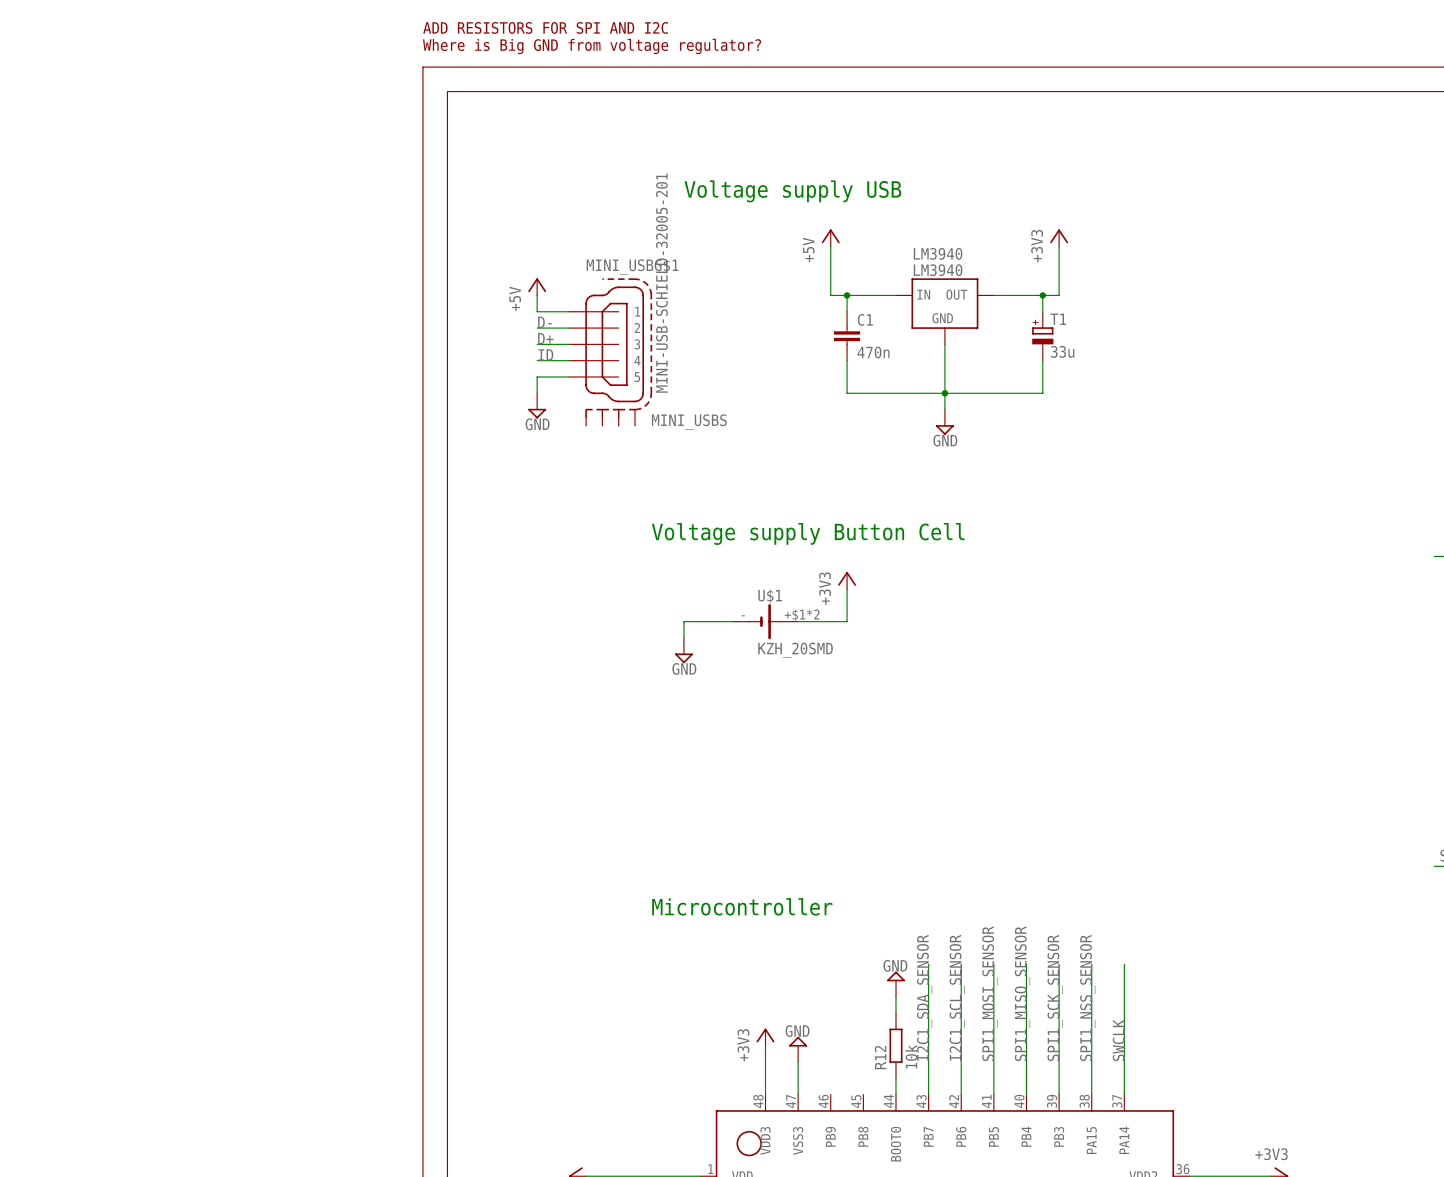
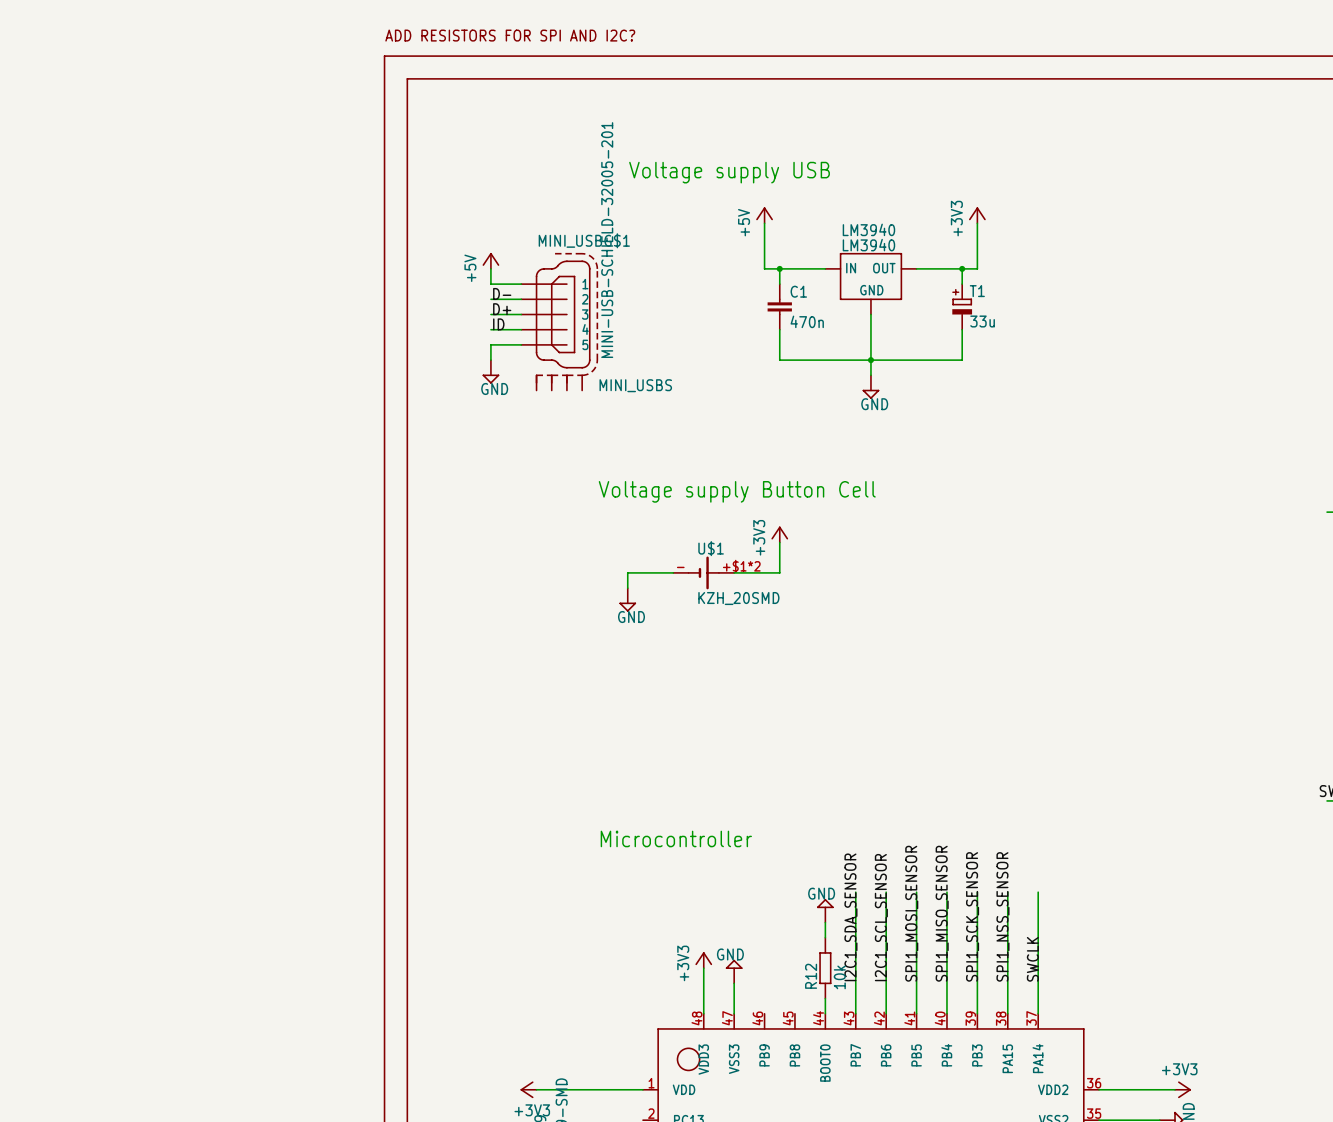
text: ADD RESISTORS FOR SPI AND I2C (545, 27) -> none
text: Where is Big GND from voltage regulator? (592, 46) -> ADD RESISTORS FOR SPI AND I2C? (510, 35)

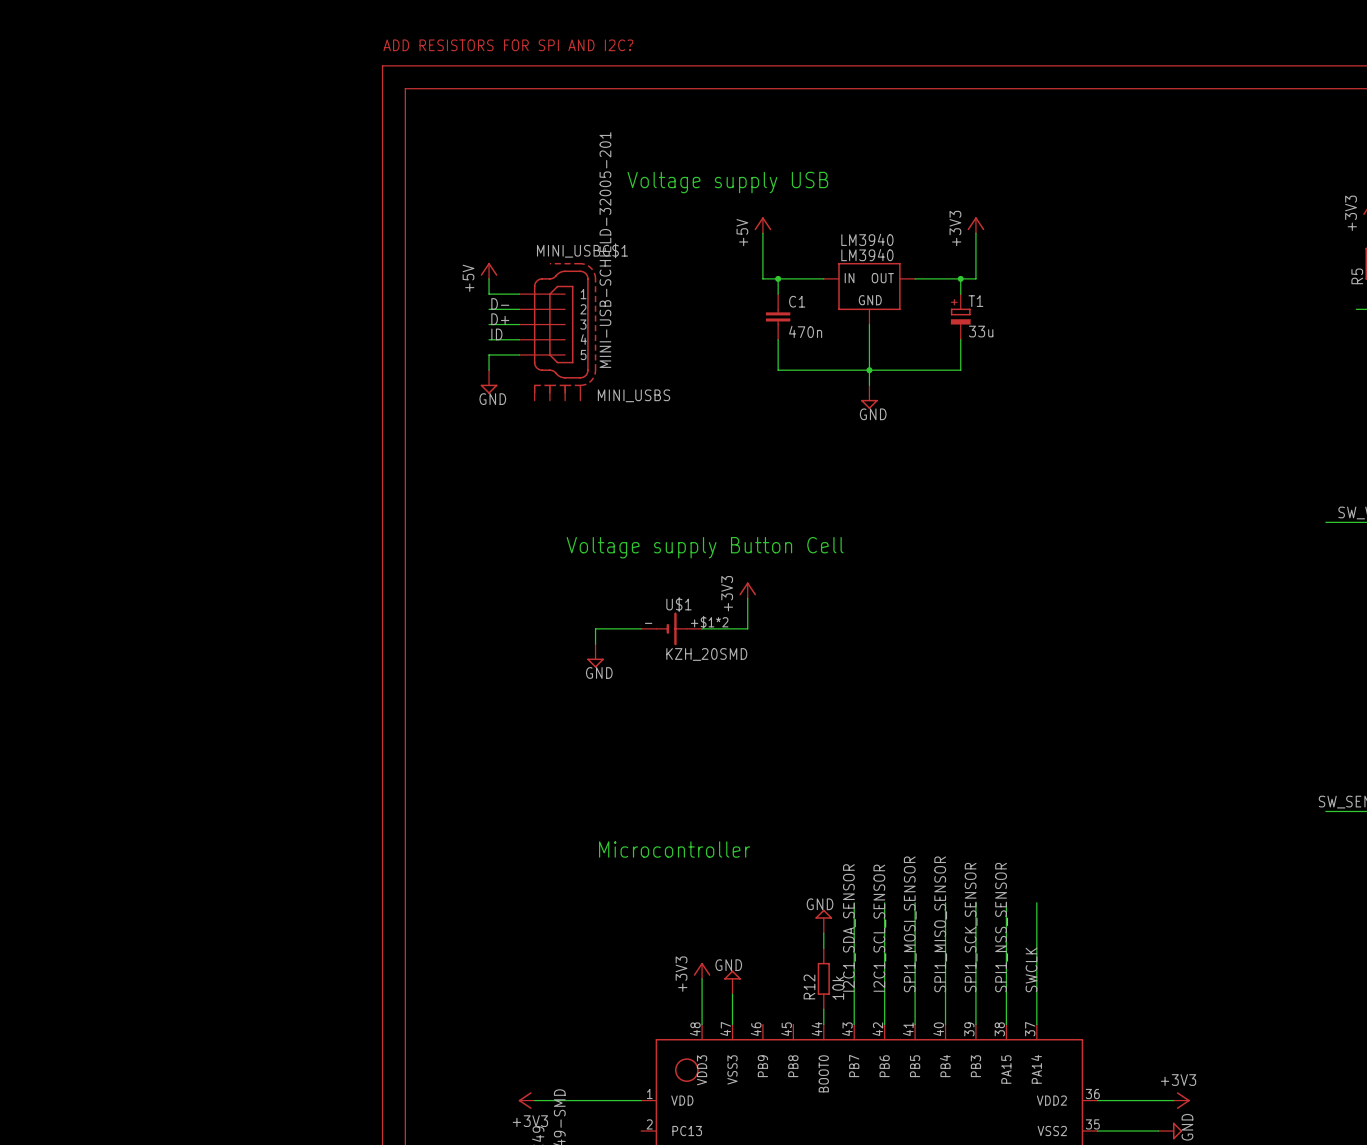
text position: Voltage supply Button Cell (737, 491) -> Voltage supply Button Cell (705, 547)
power symbol position: +3V3 (779, 534) -> +3V3 (747, 590)
wire: (779, 542) (779, 572) (734, 572) -> (747, 598) (747, 628) (702, 628)
wire: (673, 572) (627, 572) (627, 588) -> (641, 628) (595, 628) (595, 644)
U$1 position: (703, 572) -> (671, 628)
power symbol position: GND (627, 599) -> GND (595, 655)

